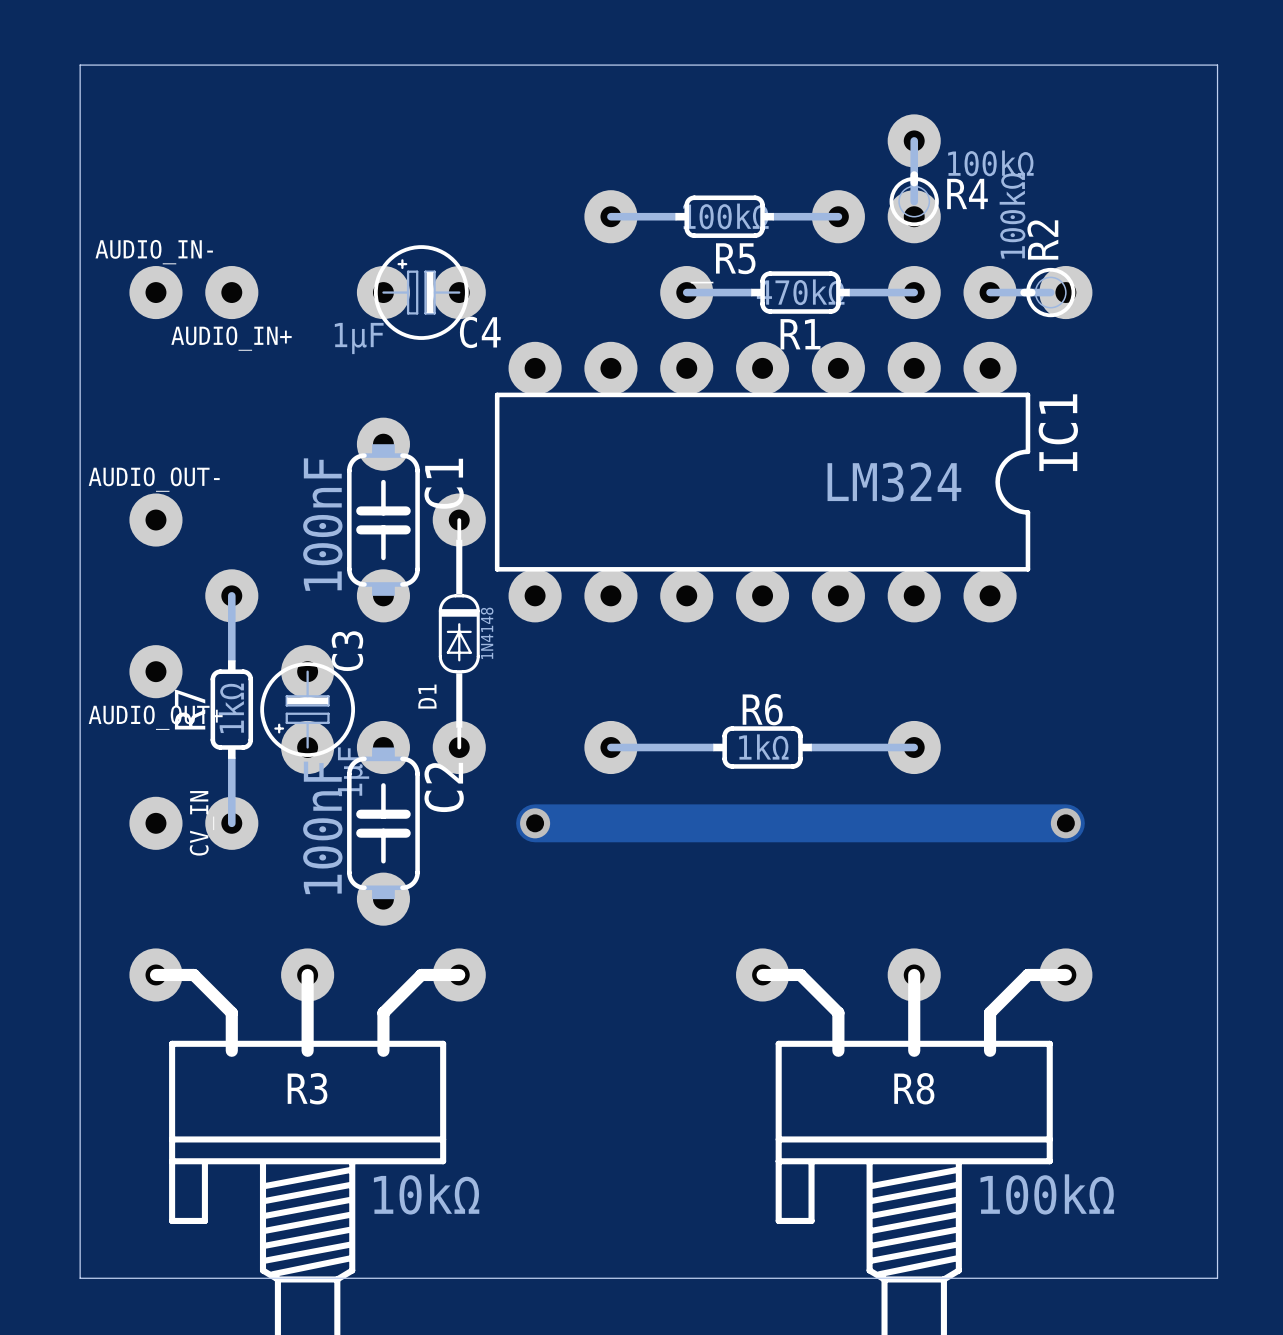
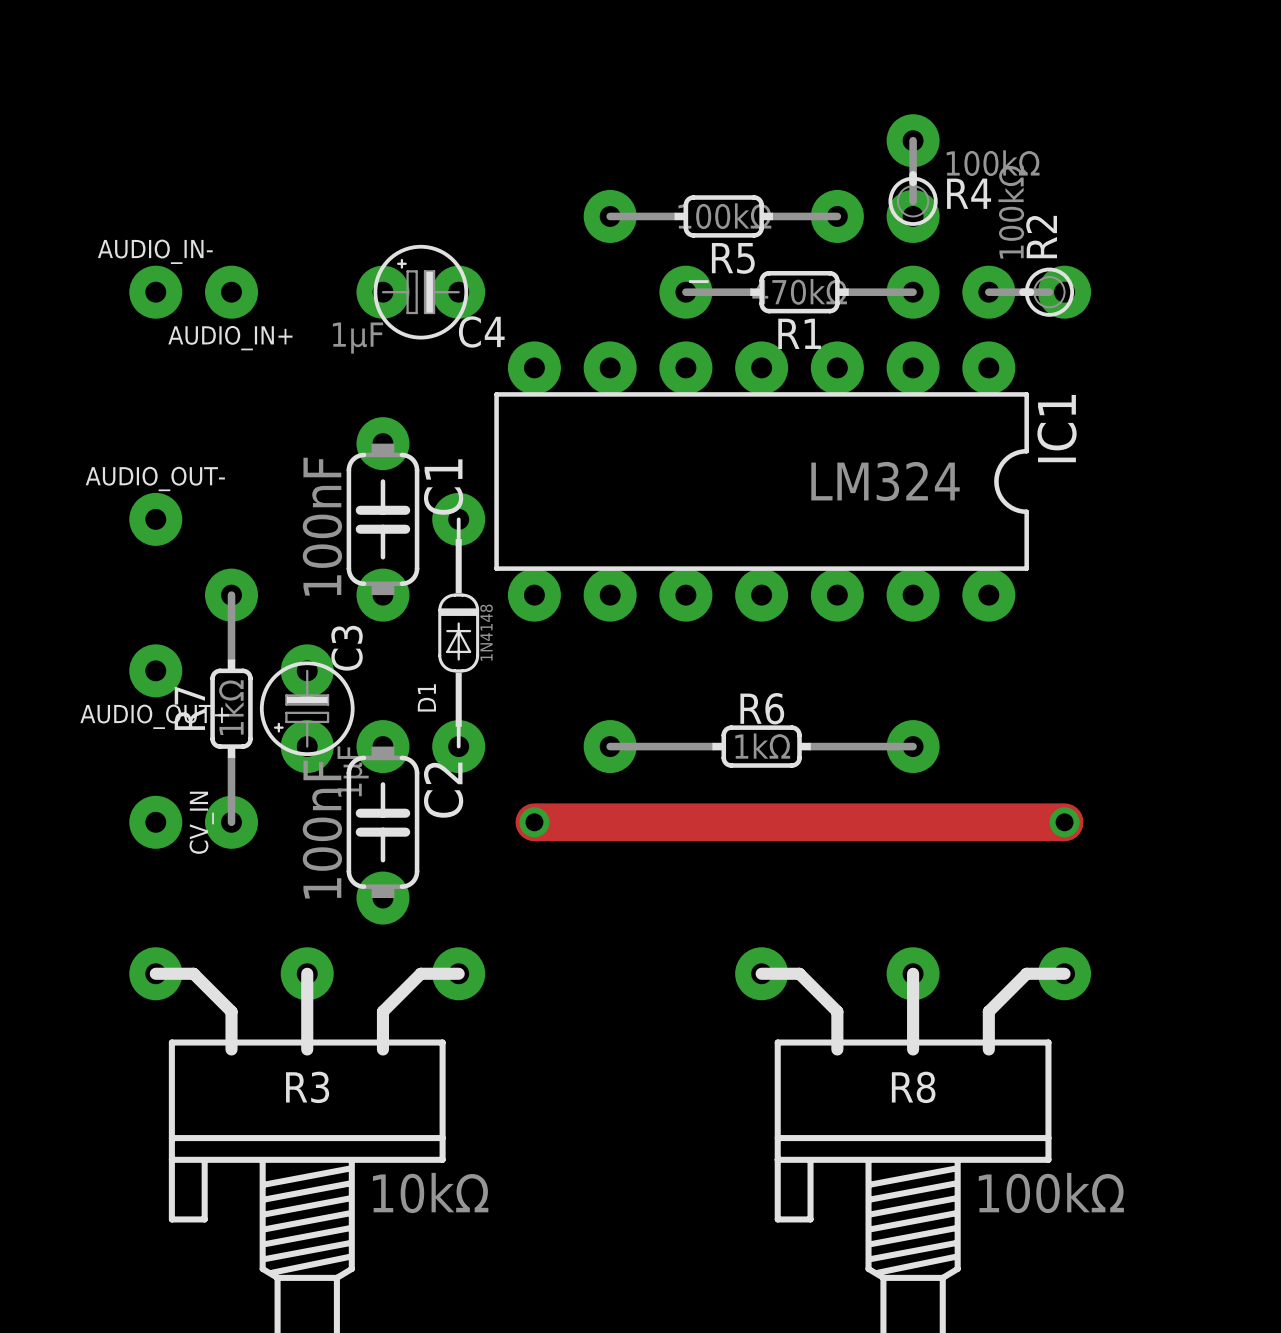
board edge: (80, 65) (1217, 65) (1217, 1278) (80, 1278) (80, 65) -> none

